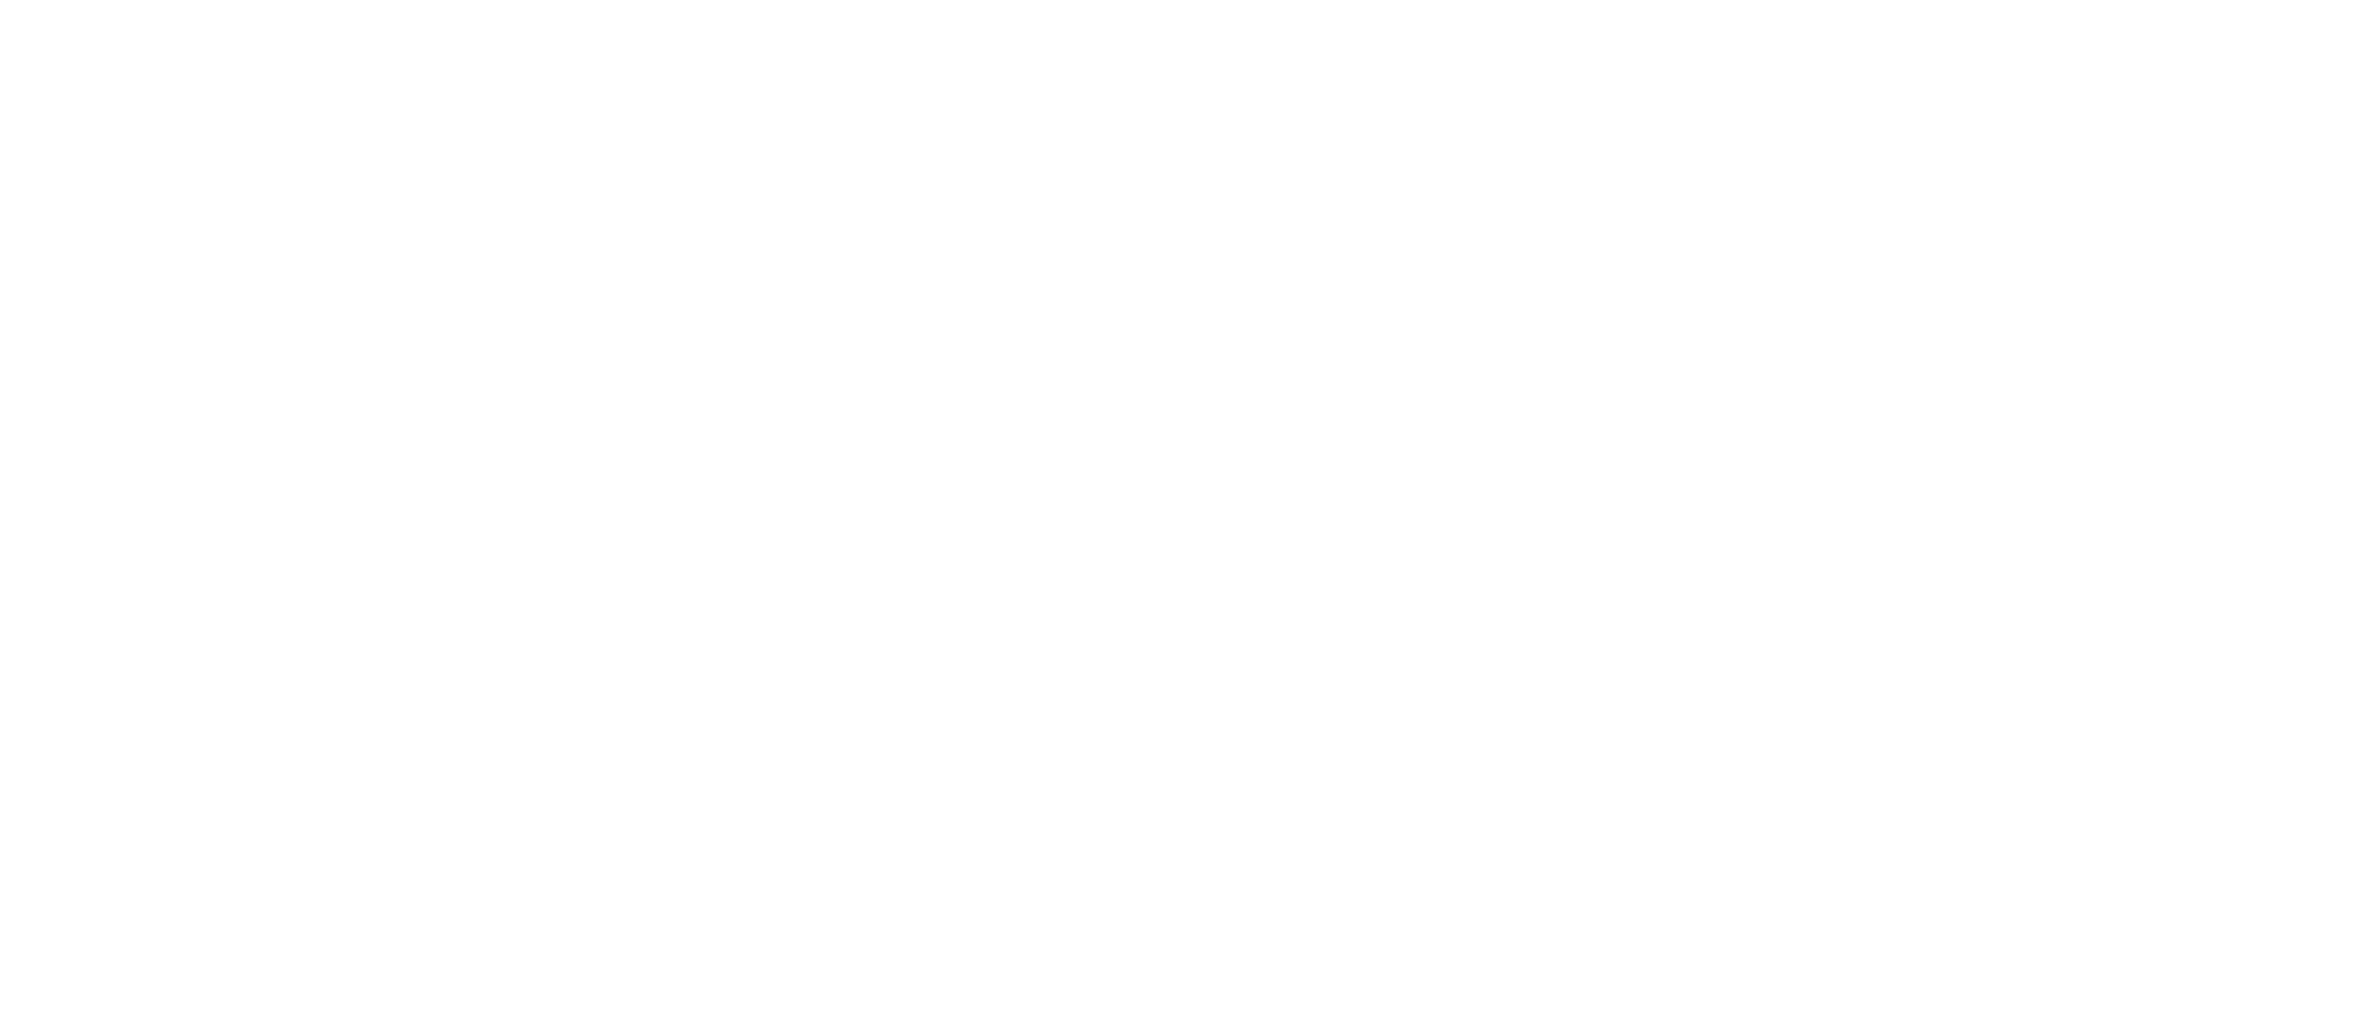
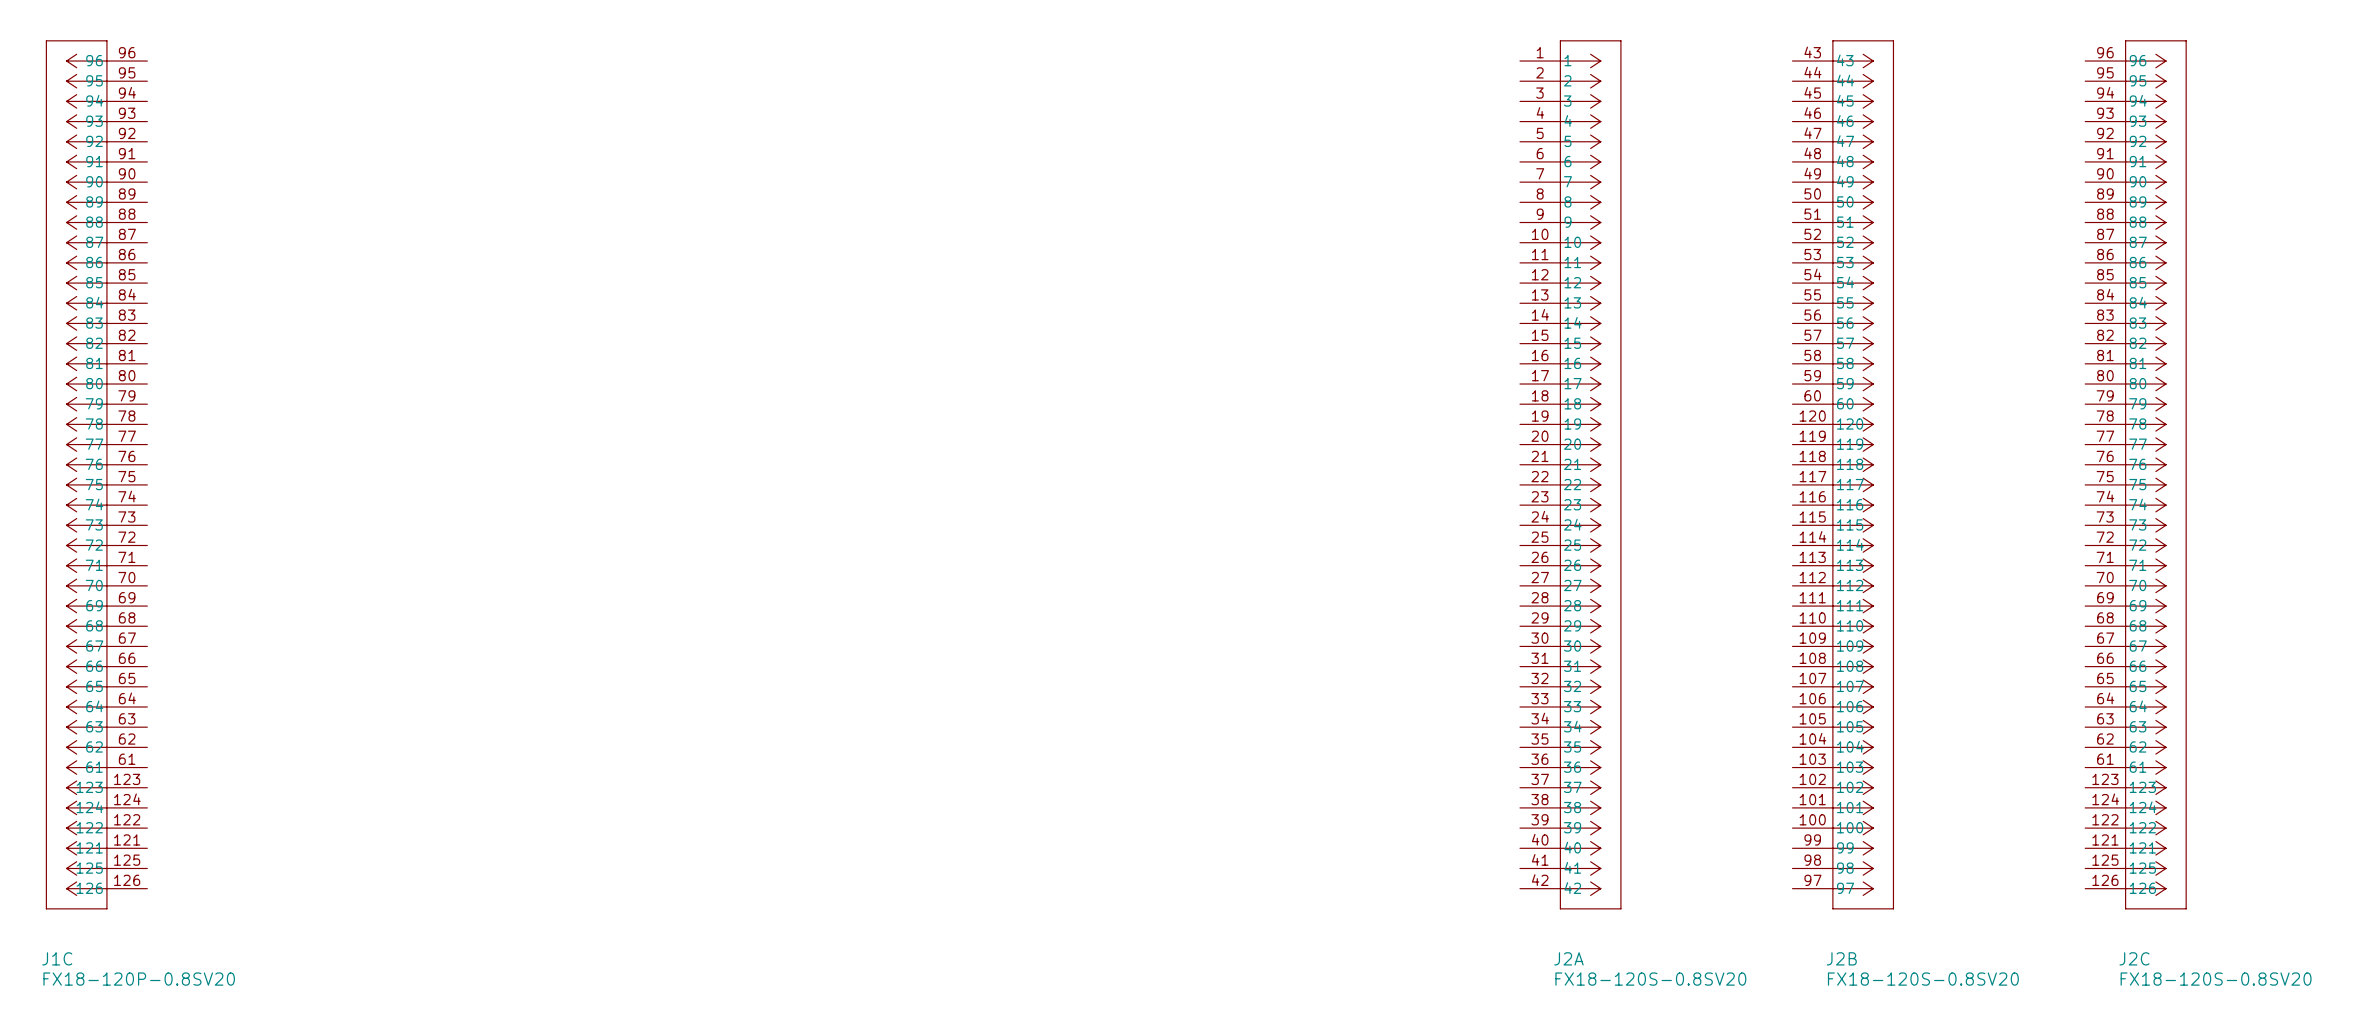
J1C: none -> FX18-120P-0.8SV20 (96, 474)
J2A: none -> FX18-120S-0.8SV20 (1570, 474)
J2B: none -> FX18-120S-0.8SV20 (1843, 474)
J2C: none -> FX18-120S-0.8SV20 (2135, 474)

